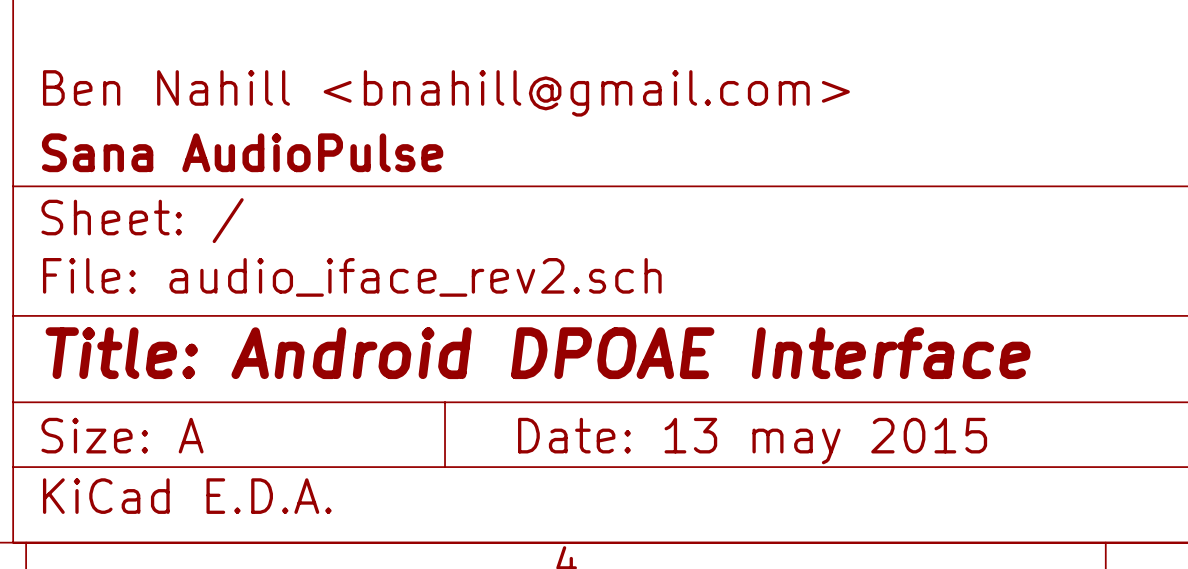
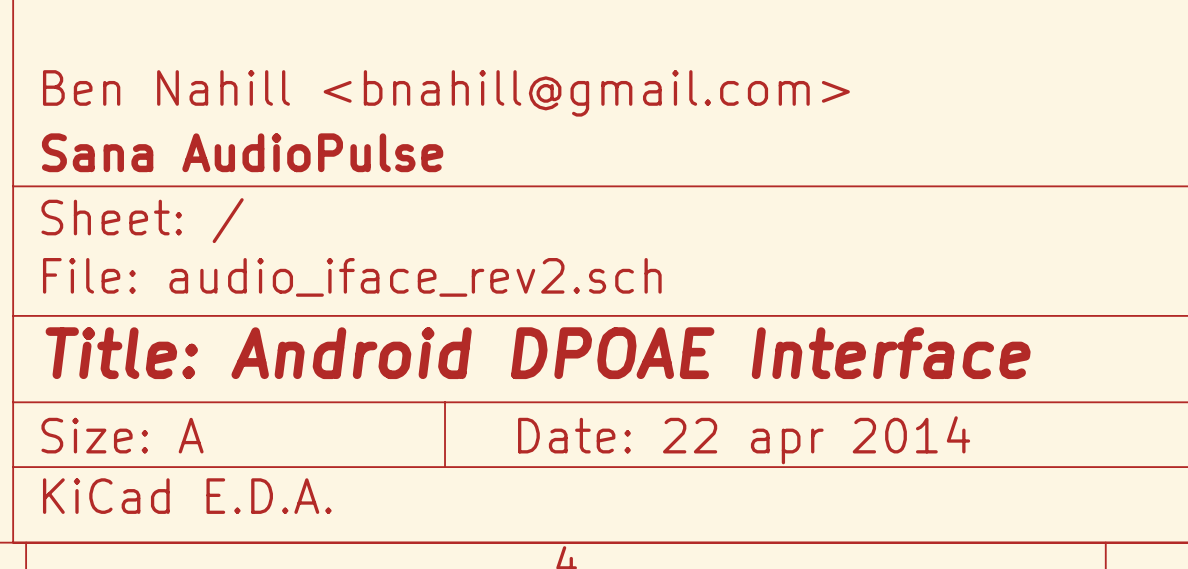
title block: Date: 13 may 2015 (752, 441) -> Date: 22 apr 2014 (744, 440)

